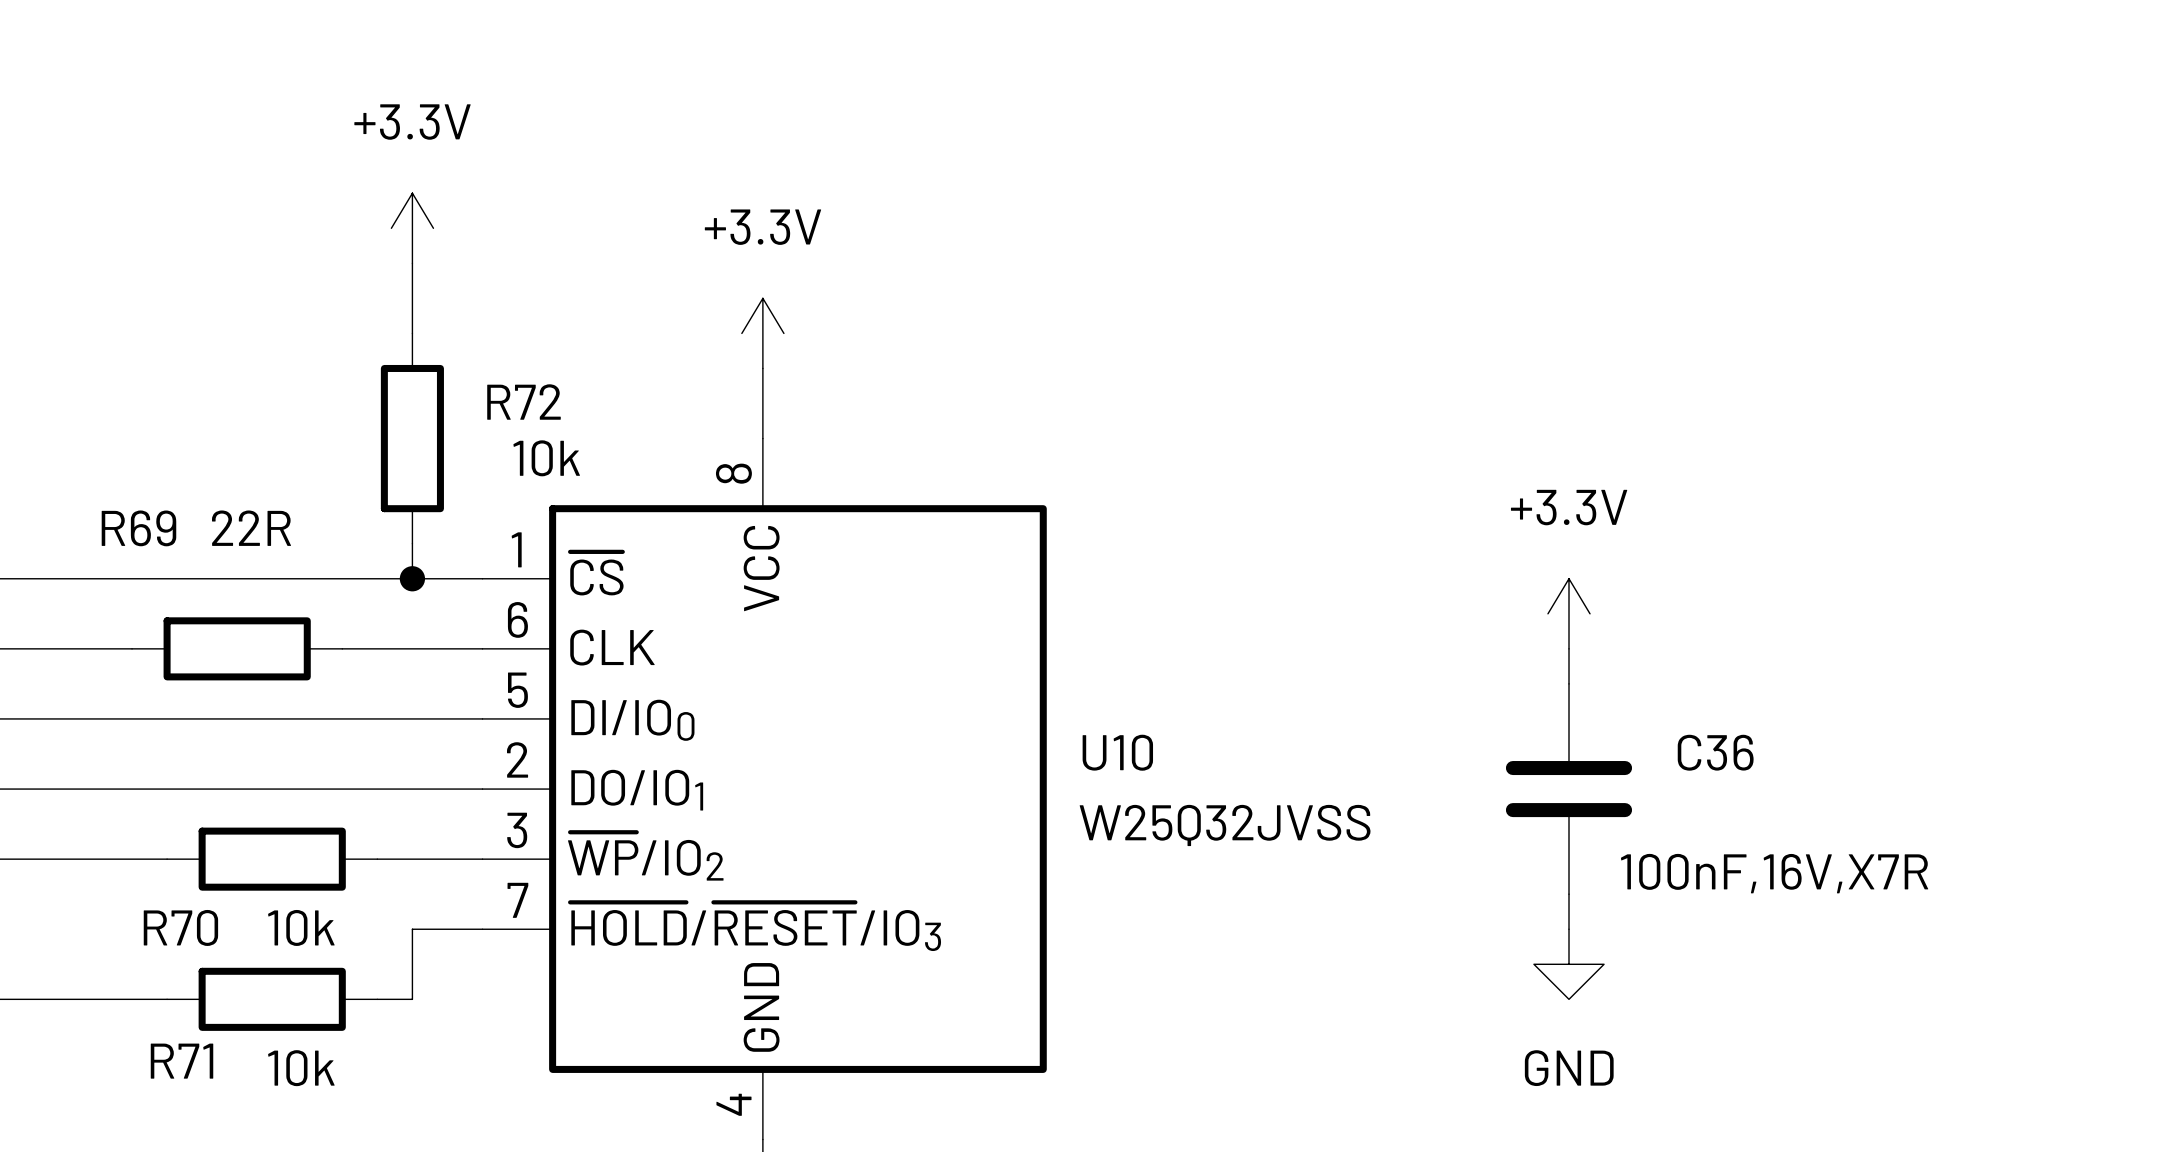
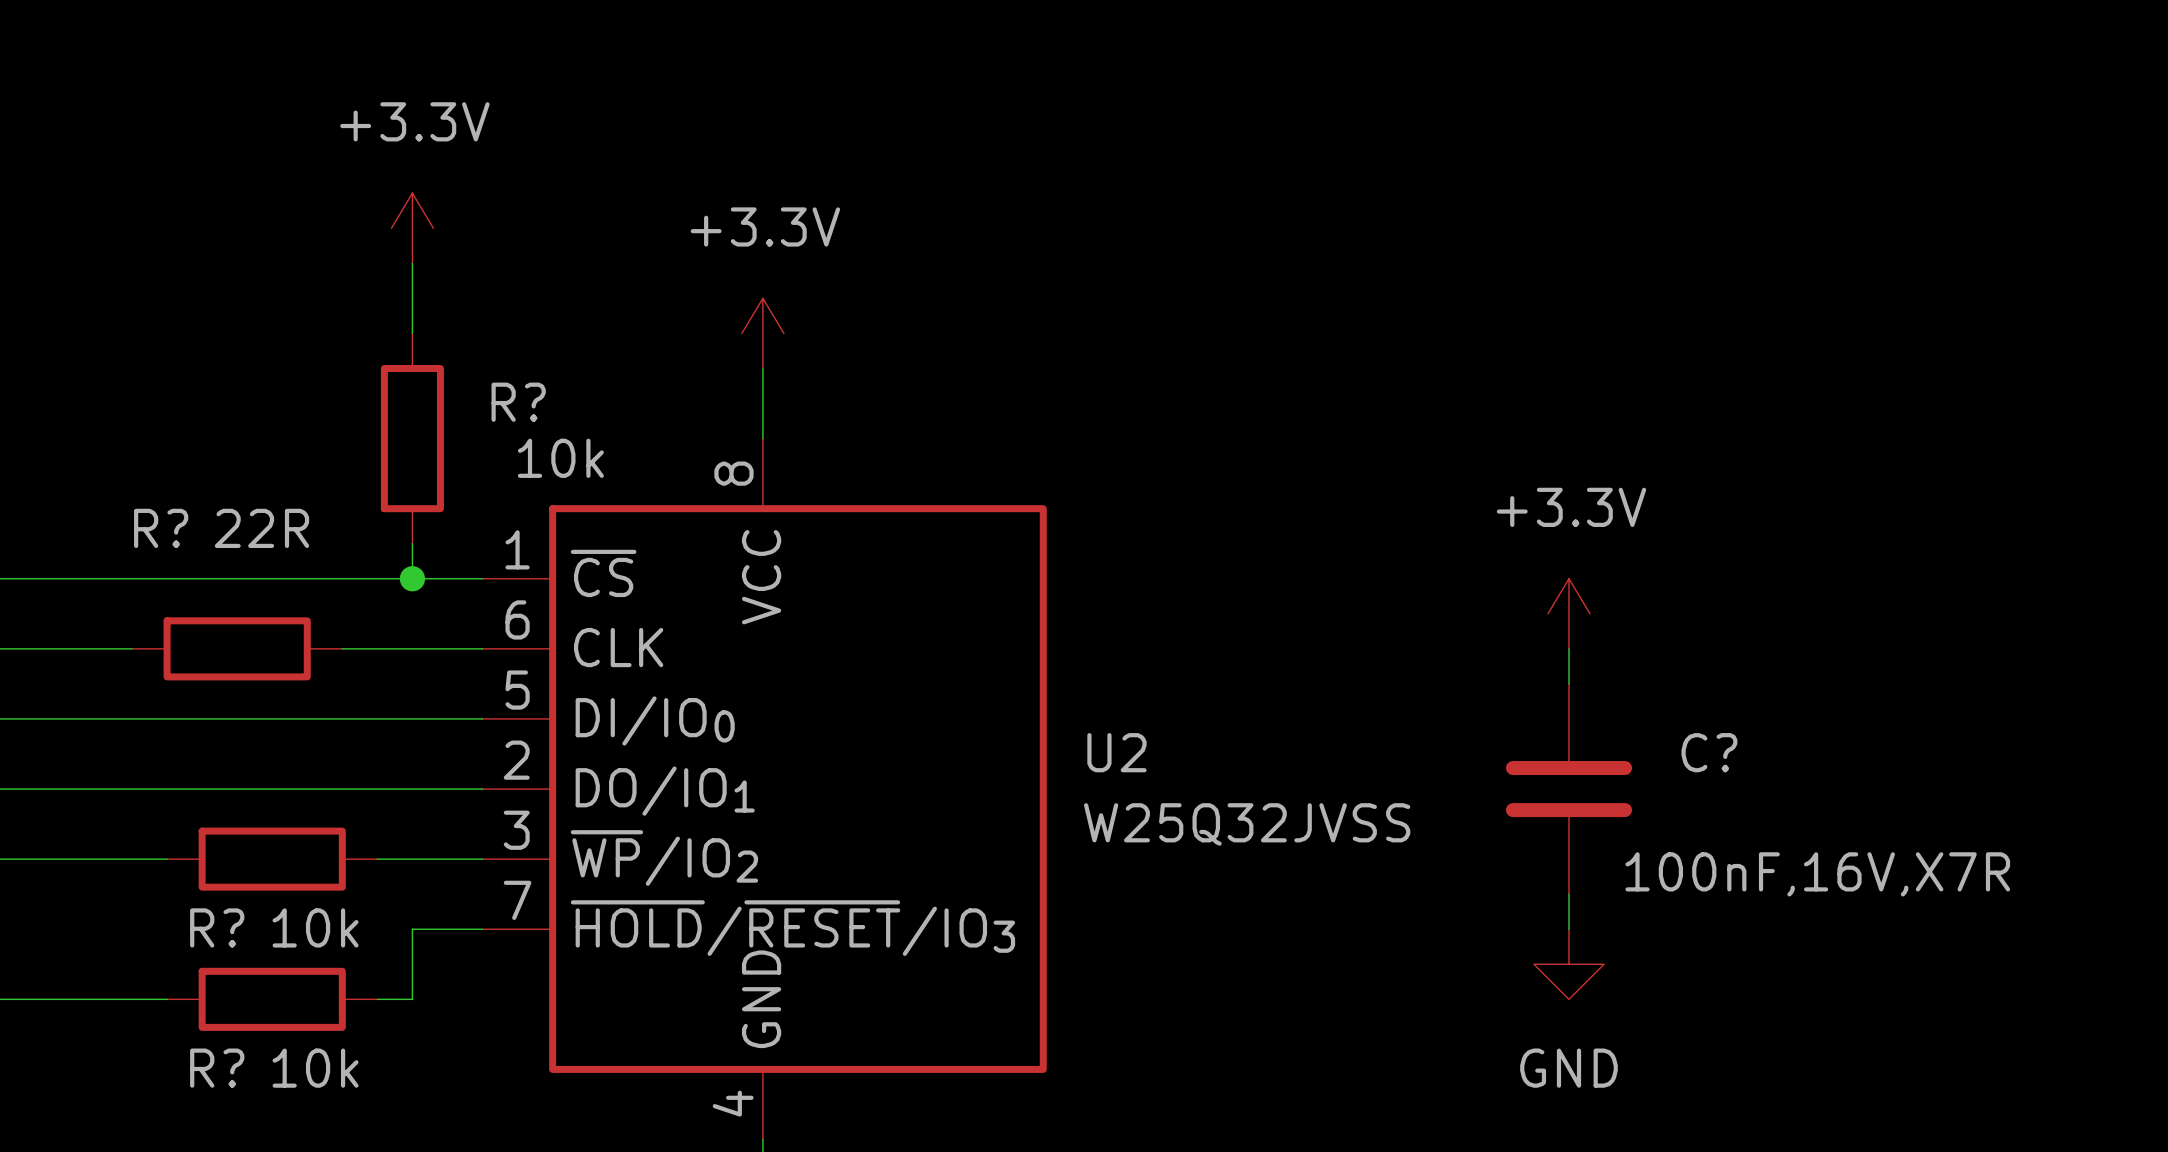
R72 name: R72 (523, 402) -> R? (518, 402)
R69 name: R69 (138, 528) -> R? (161, 528)
U10 name: U10 (1117, 752) -> U2 (1116, 752)
C36 name: C36 (1715, 752) -> C? (1709, 752)
R70 name: R70 (180, 927) -> R? (217, 927)
R71 name: R71 (182, 1061) -> R? (217, 1068)

